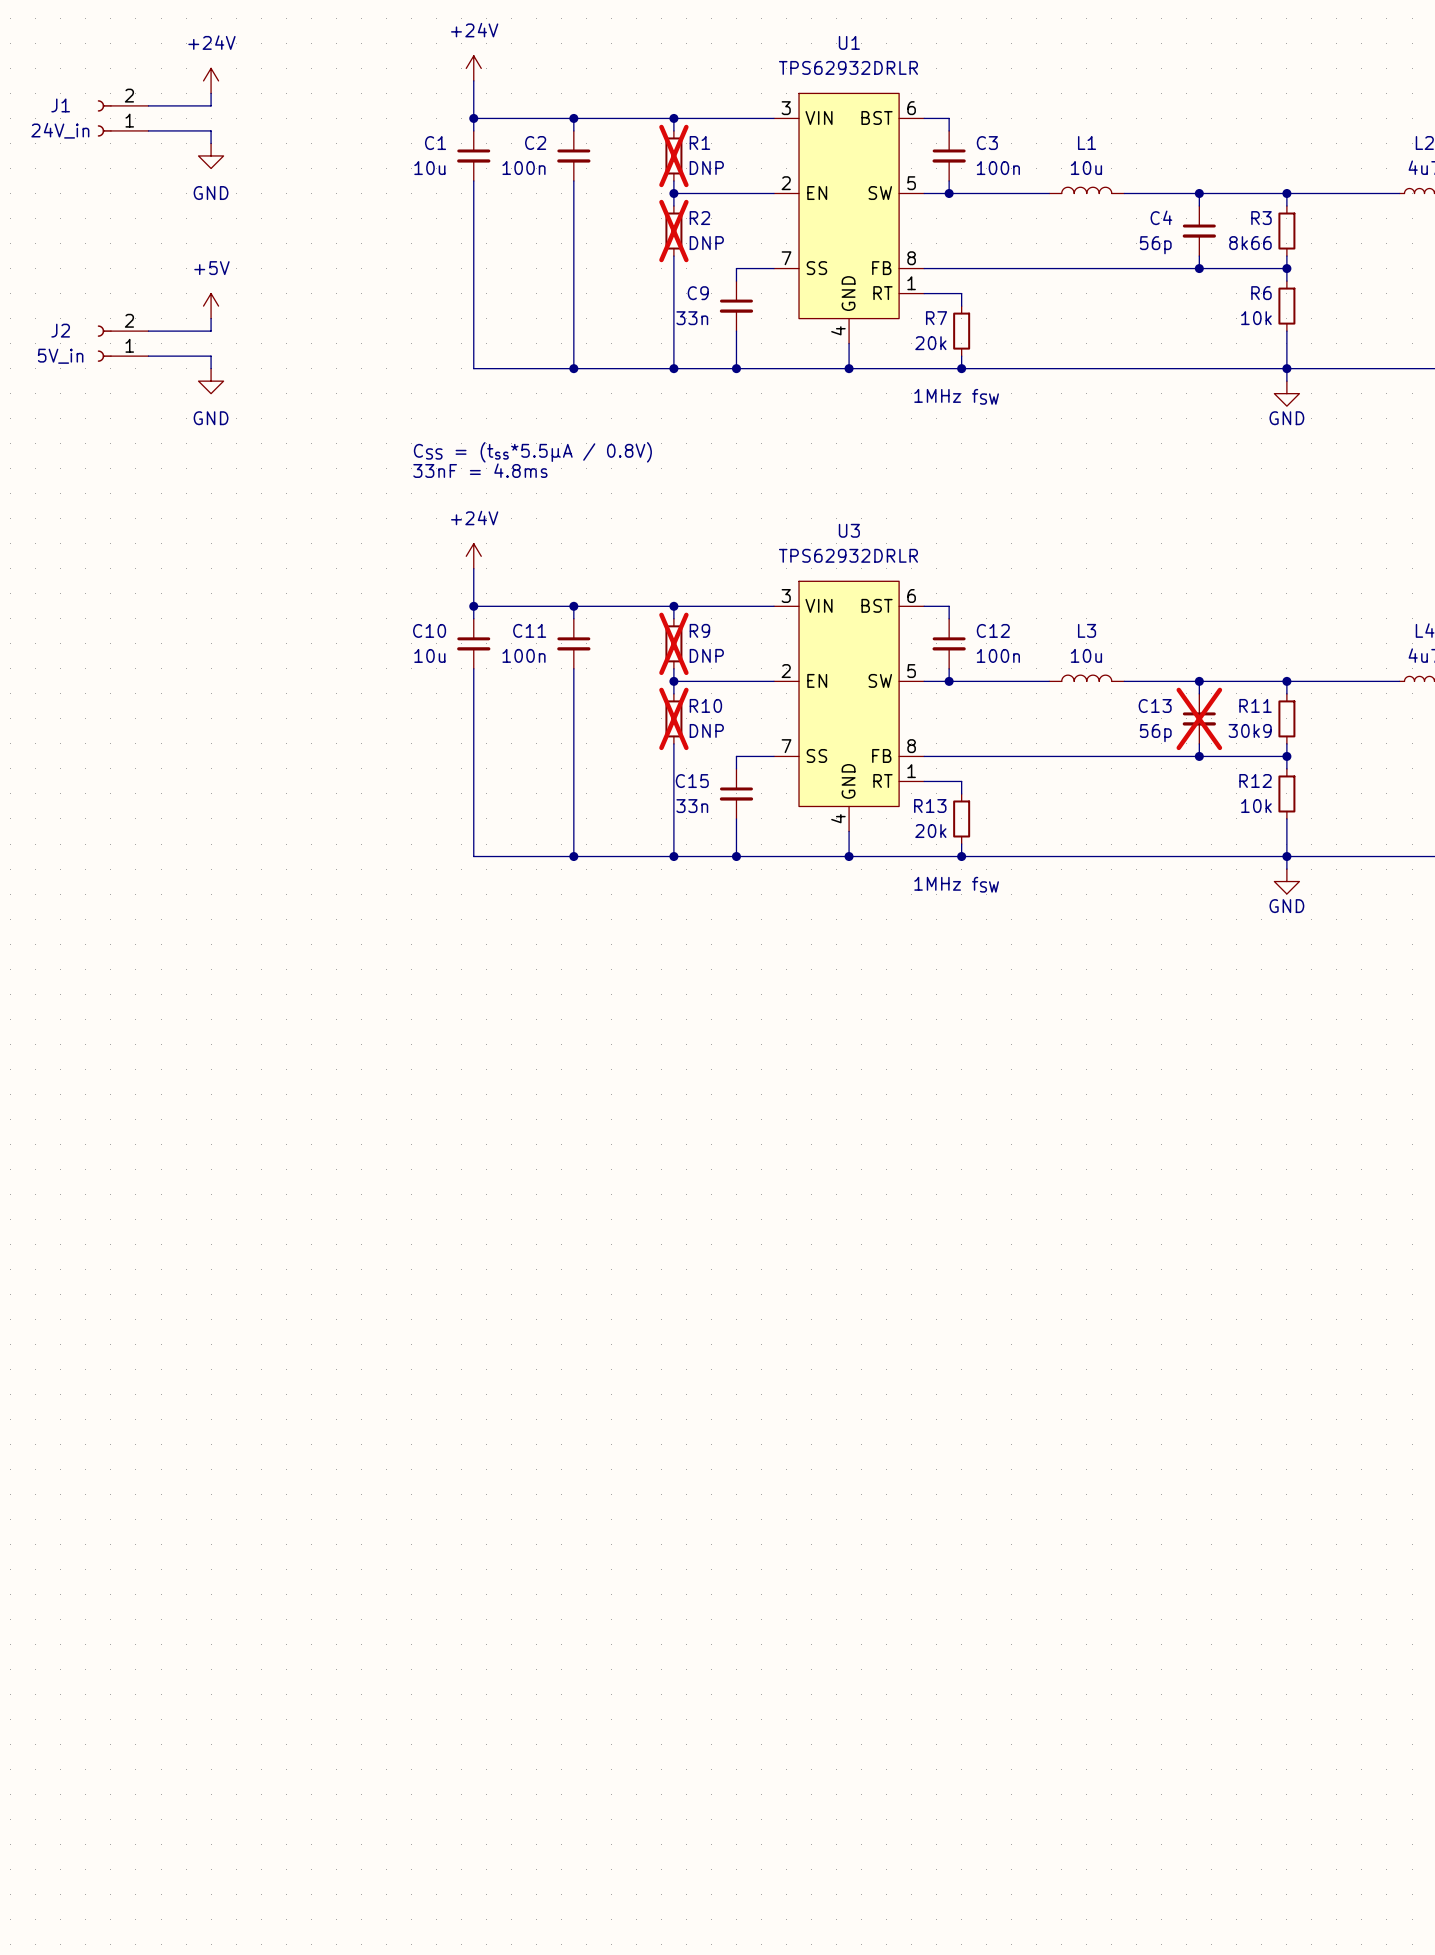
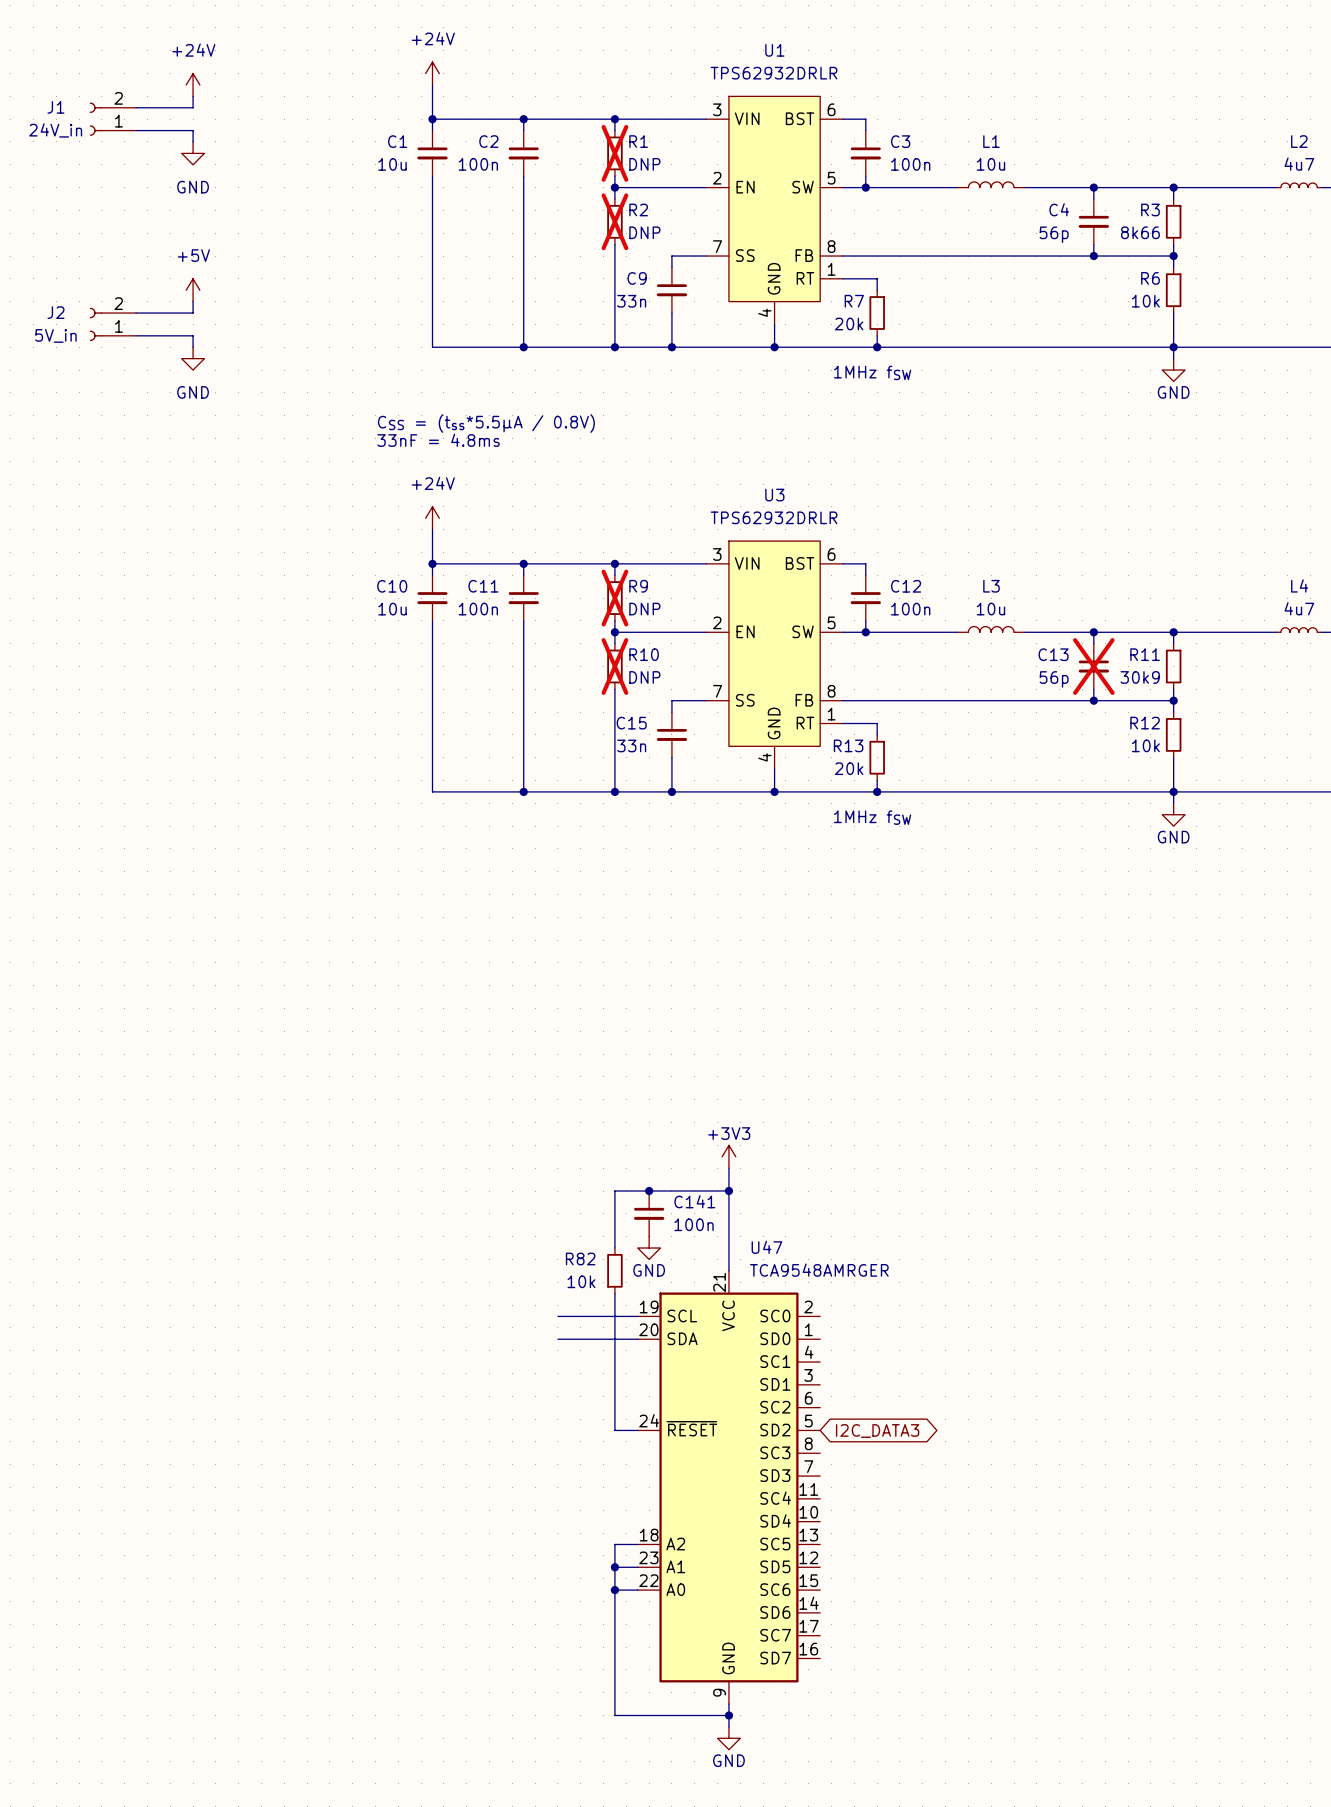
power symbol: none -> +3V3 (728, 1156)
wire: none -> (728, 1168) (728, 1270)
junction: none -> (649, 1191)
wire: none -> (728, 1191) (614, 1191) (614, 1248)
junction: none -> (728, 1191)
C141: none -> 100n (649, 1213)
power symbol: none -> GND (649, 1248)
R82: none -> 10k (614, 1270)
wire: none -> (614, 1293) (614, 1430) (637, 1430)
wire: none -> (557, 1316) (637, 1316)
wire: none -> (557, 1339) (637, 1339)
global label: none -> I2C_DATA3 (877, 1430)
U47: none -> TCA9548AMRGER (728, 1487)
wire: none -> (637, 1544) (614, 1544) (614, 1715) (728, 1715)
wire: none -> (614, 1567) (637, 1567)
junction: none -> (614, 1567)
wire: none -> (614, 1590) (637, 1590)
junction: none -> (614, 1590)
wire: none -> (728, 1704) (728, 1726)
junction: none -> (728, 1715)
power symbol: none -> GND (728, 1738)

